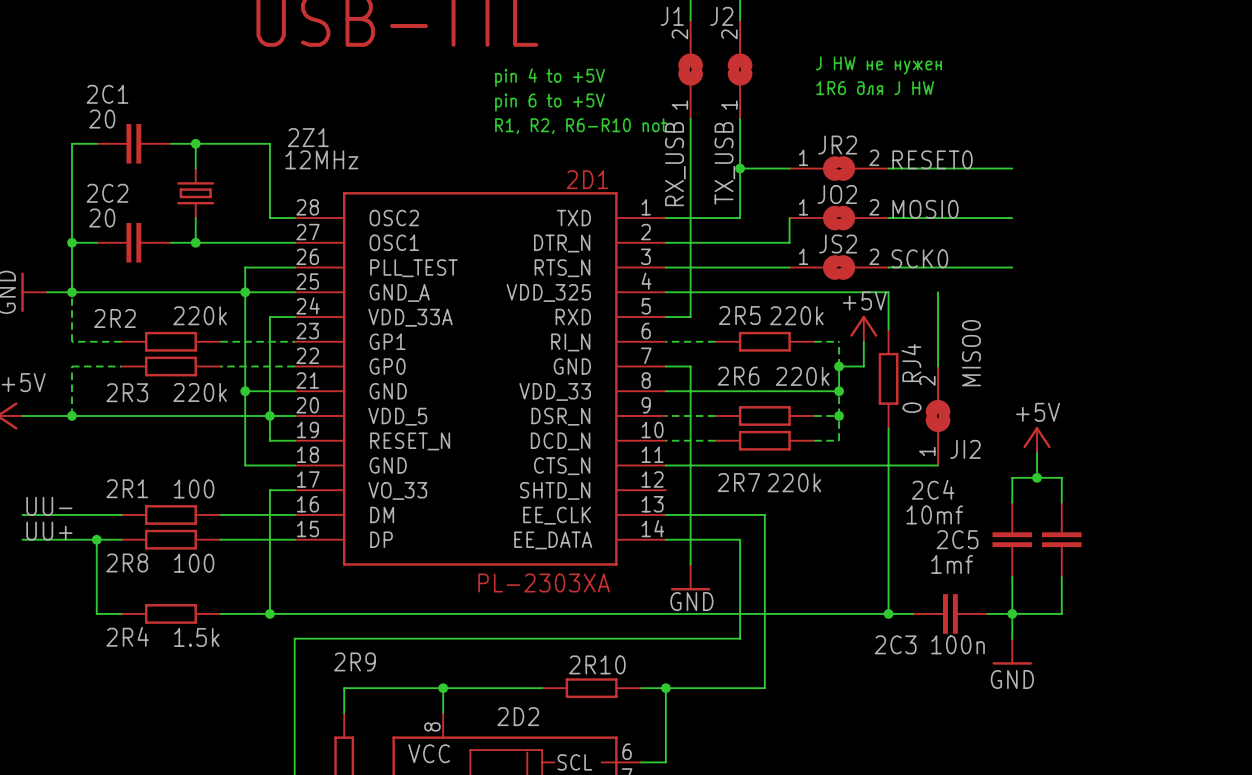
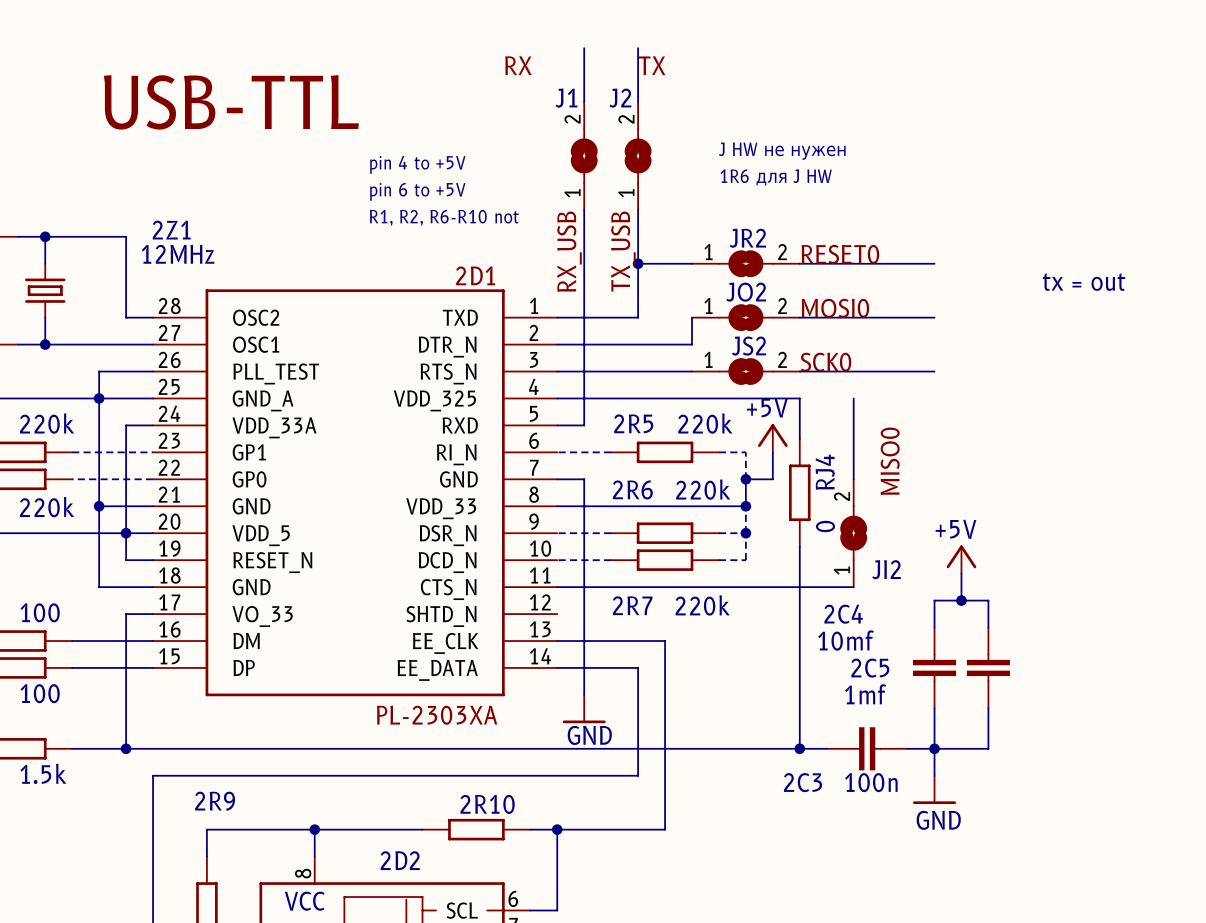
text: none -> tx = out (1084, 281)

